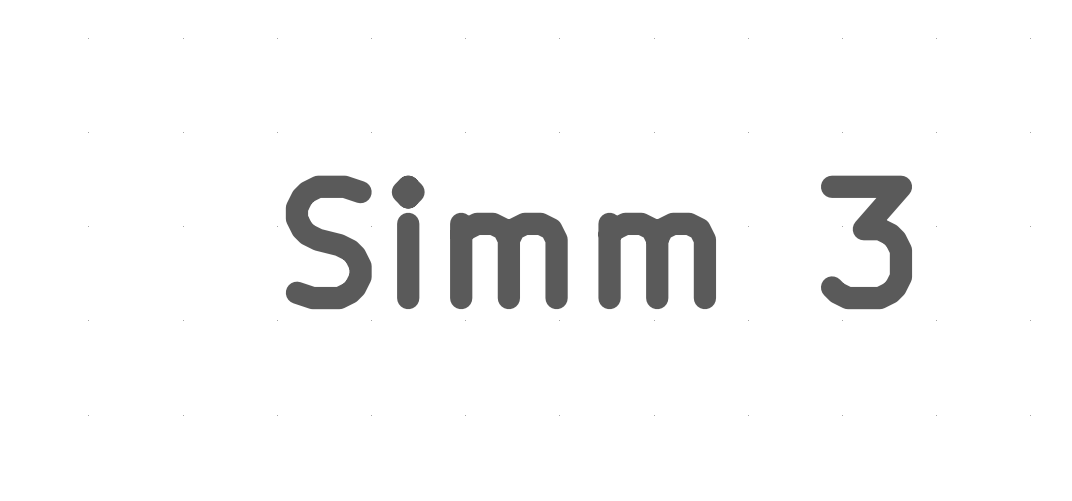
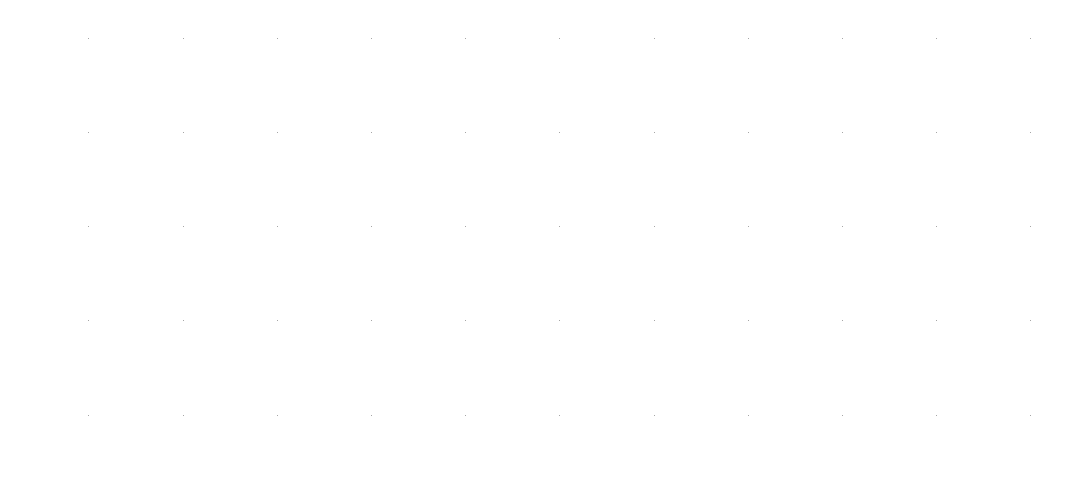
text: Simm 3 (598, 242) -> none

